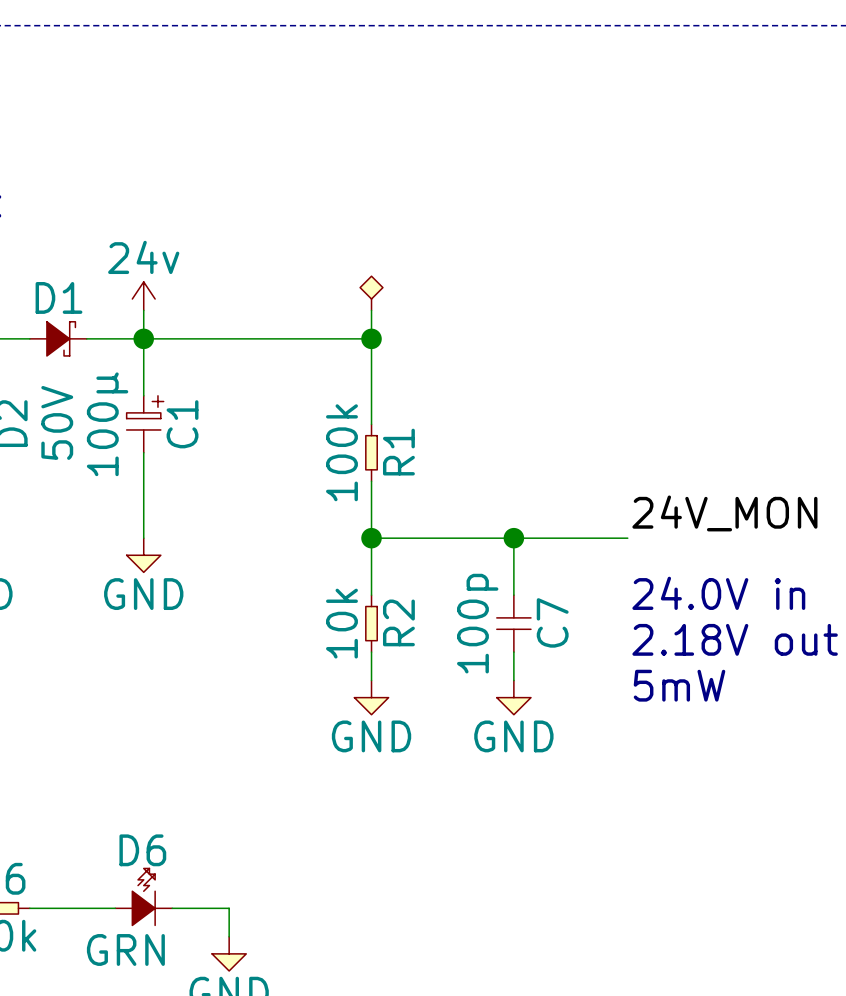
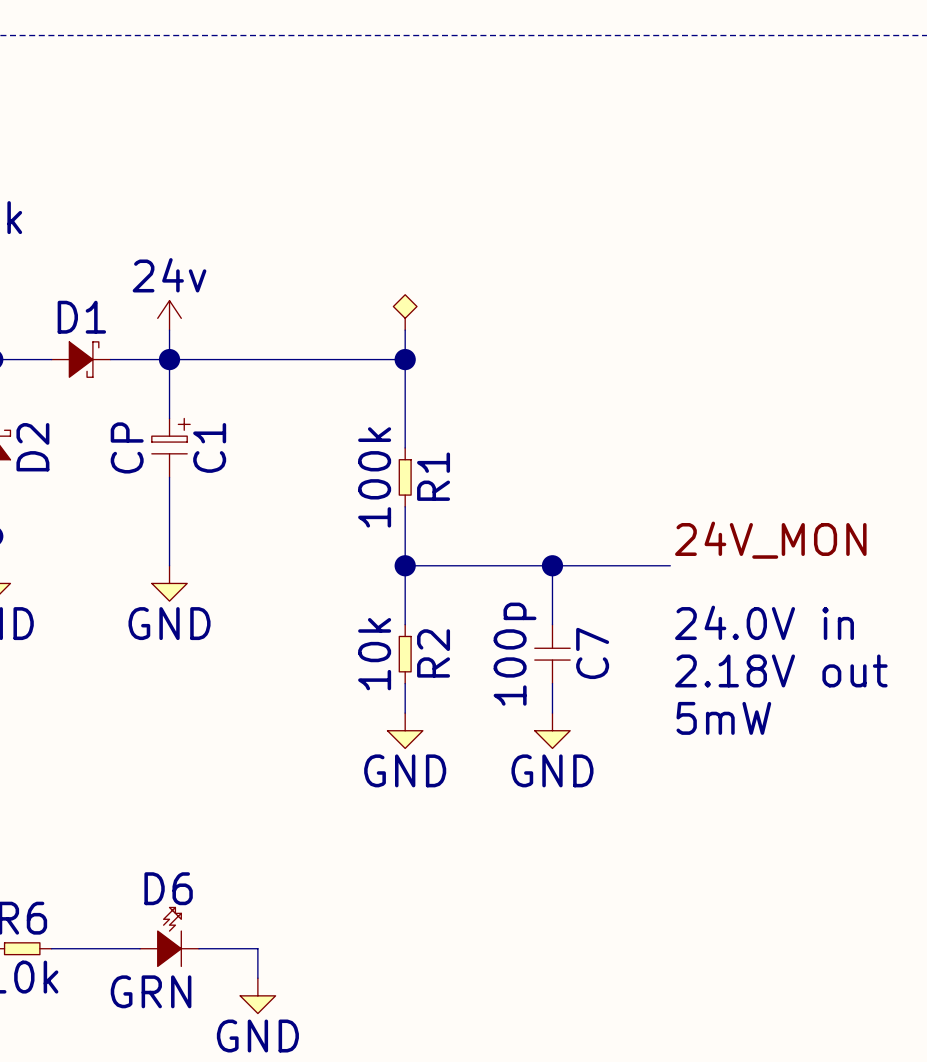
C1 text: 50V (57, 422) -> none
C1 value: 100µ (107, 424) -> CP (127, 447)

